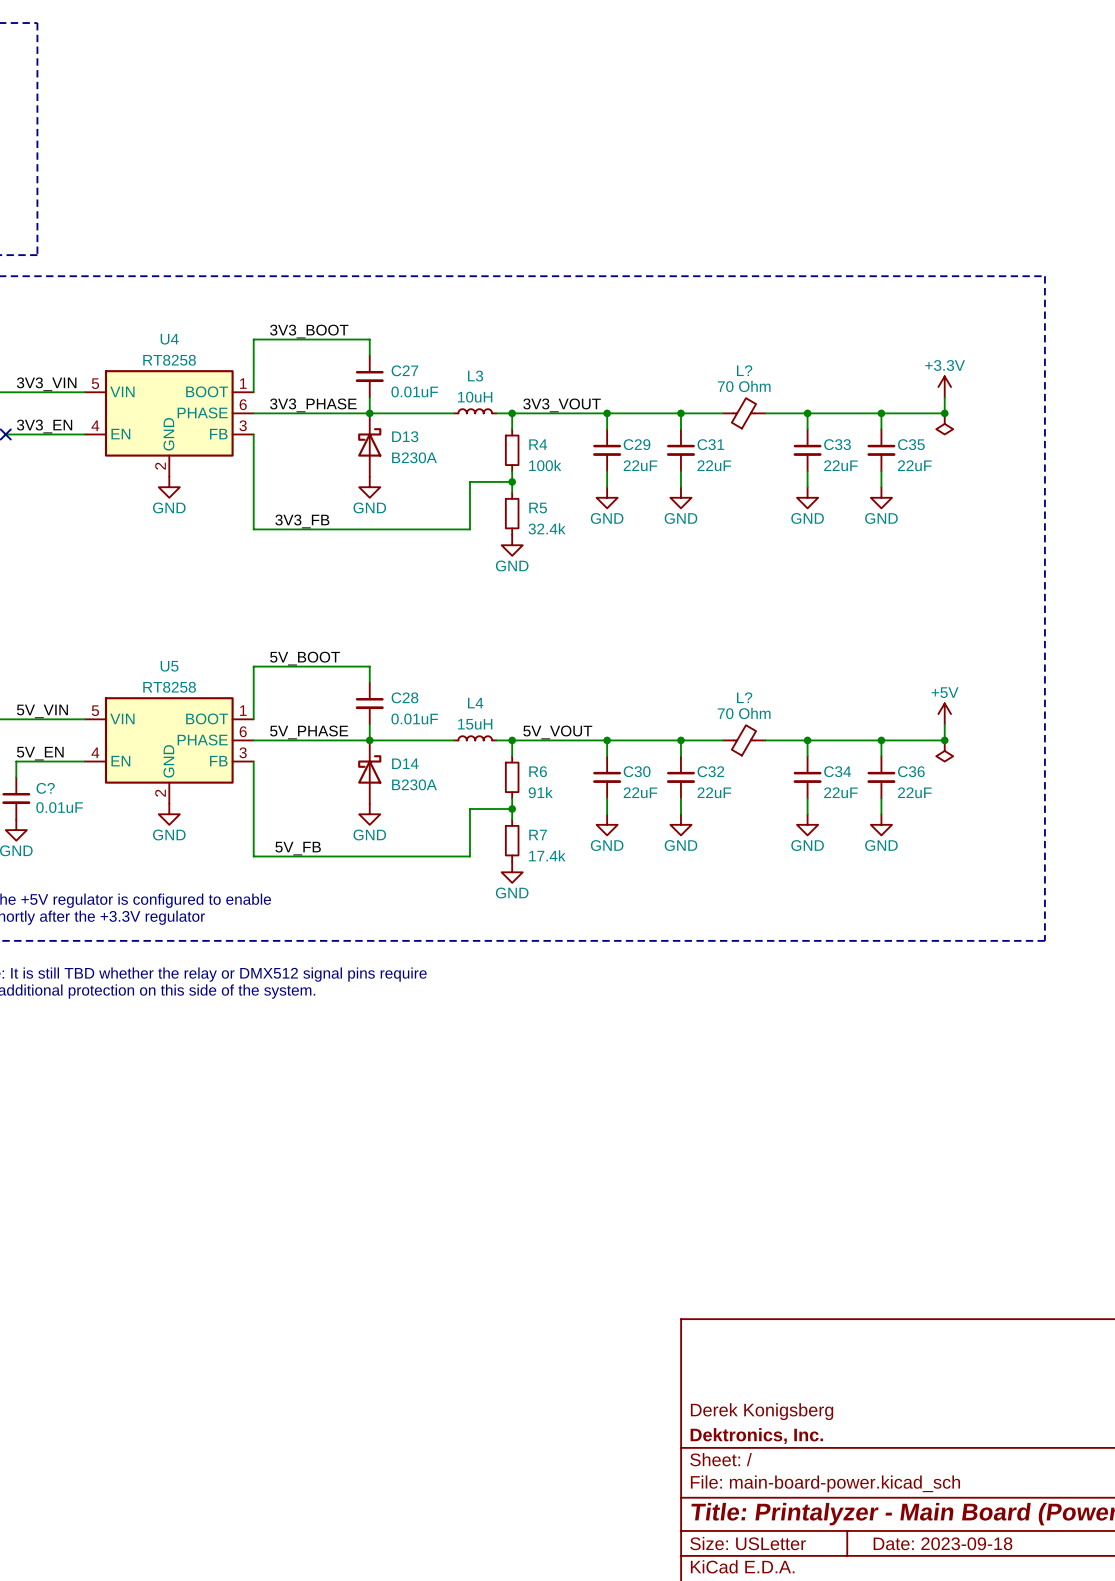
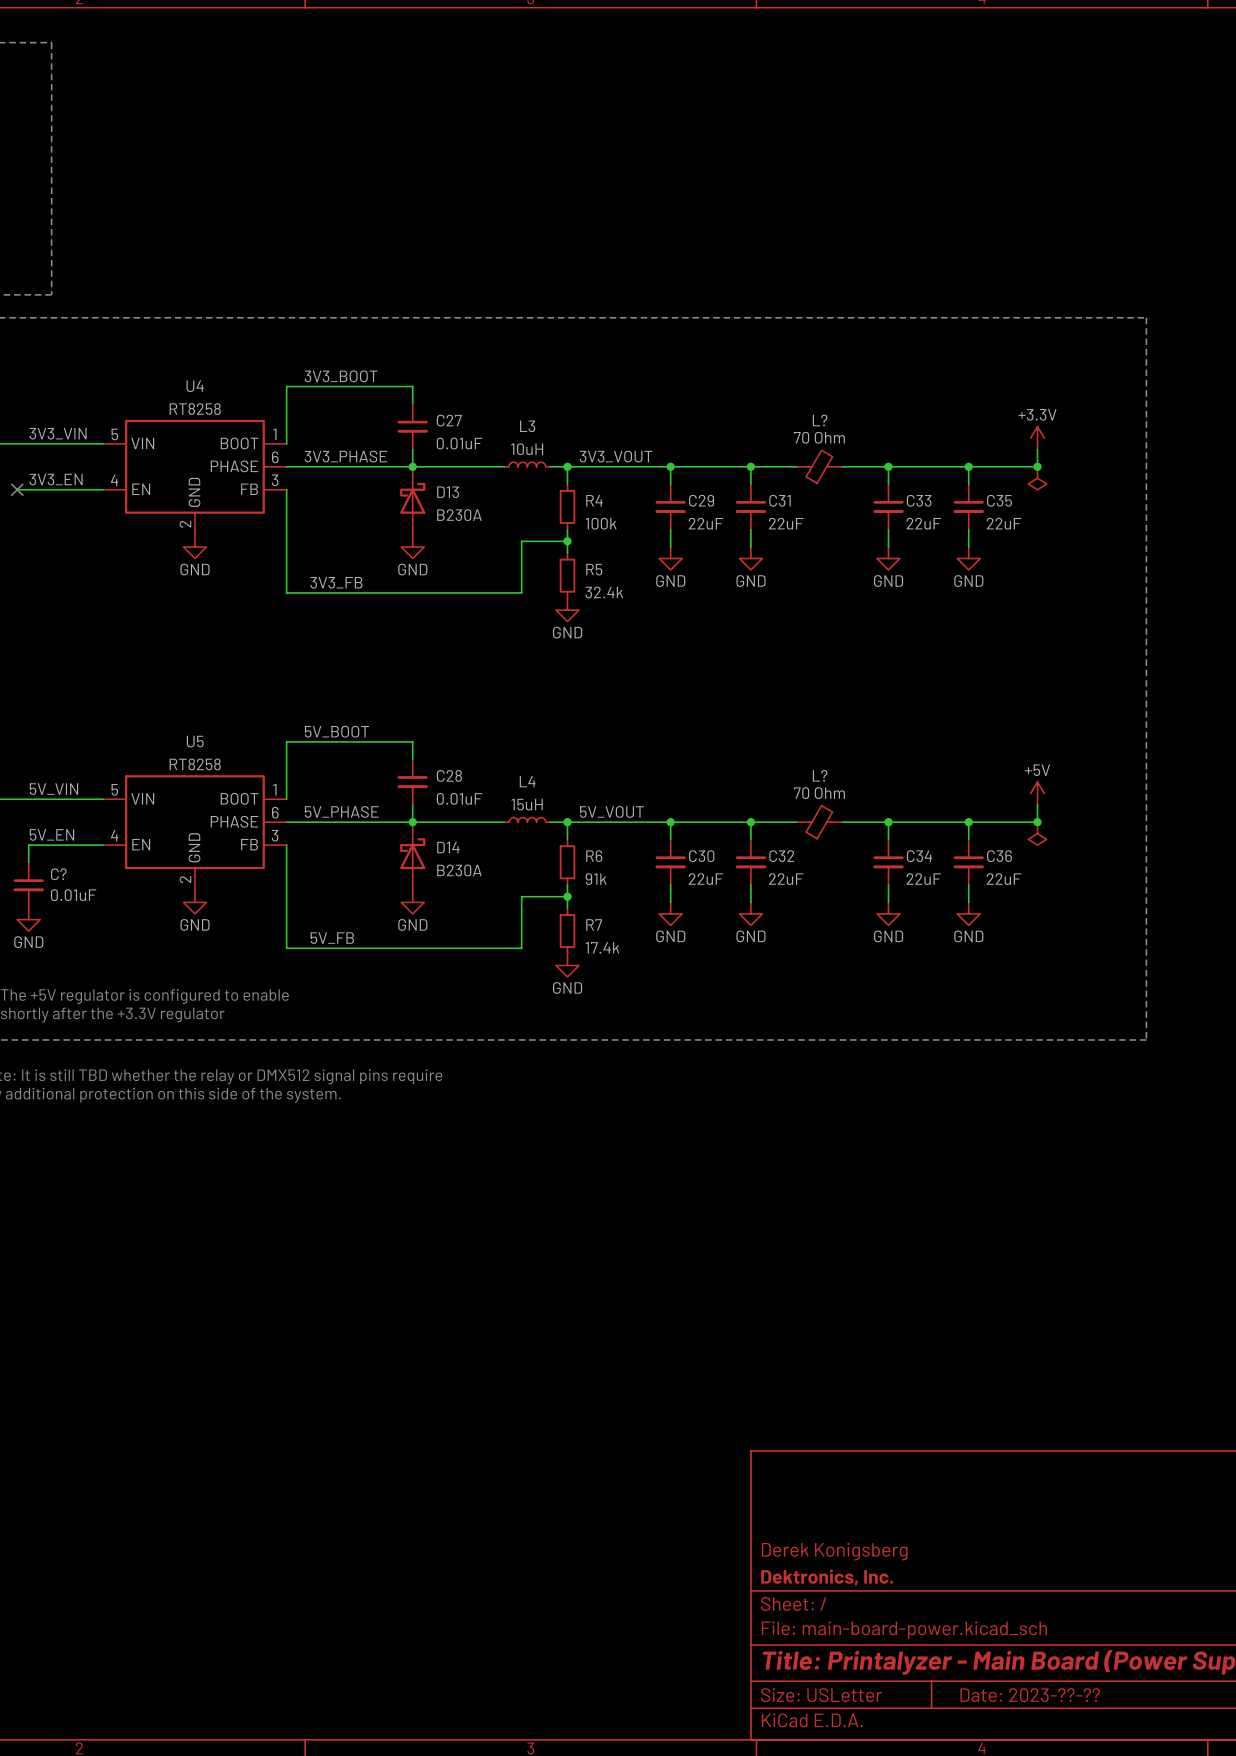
title block: Date: 2023-09-18 (943, 1543) -> Date: 2023-??-?? (1030, 1695)

